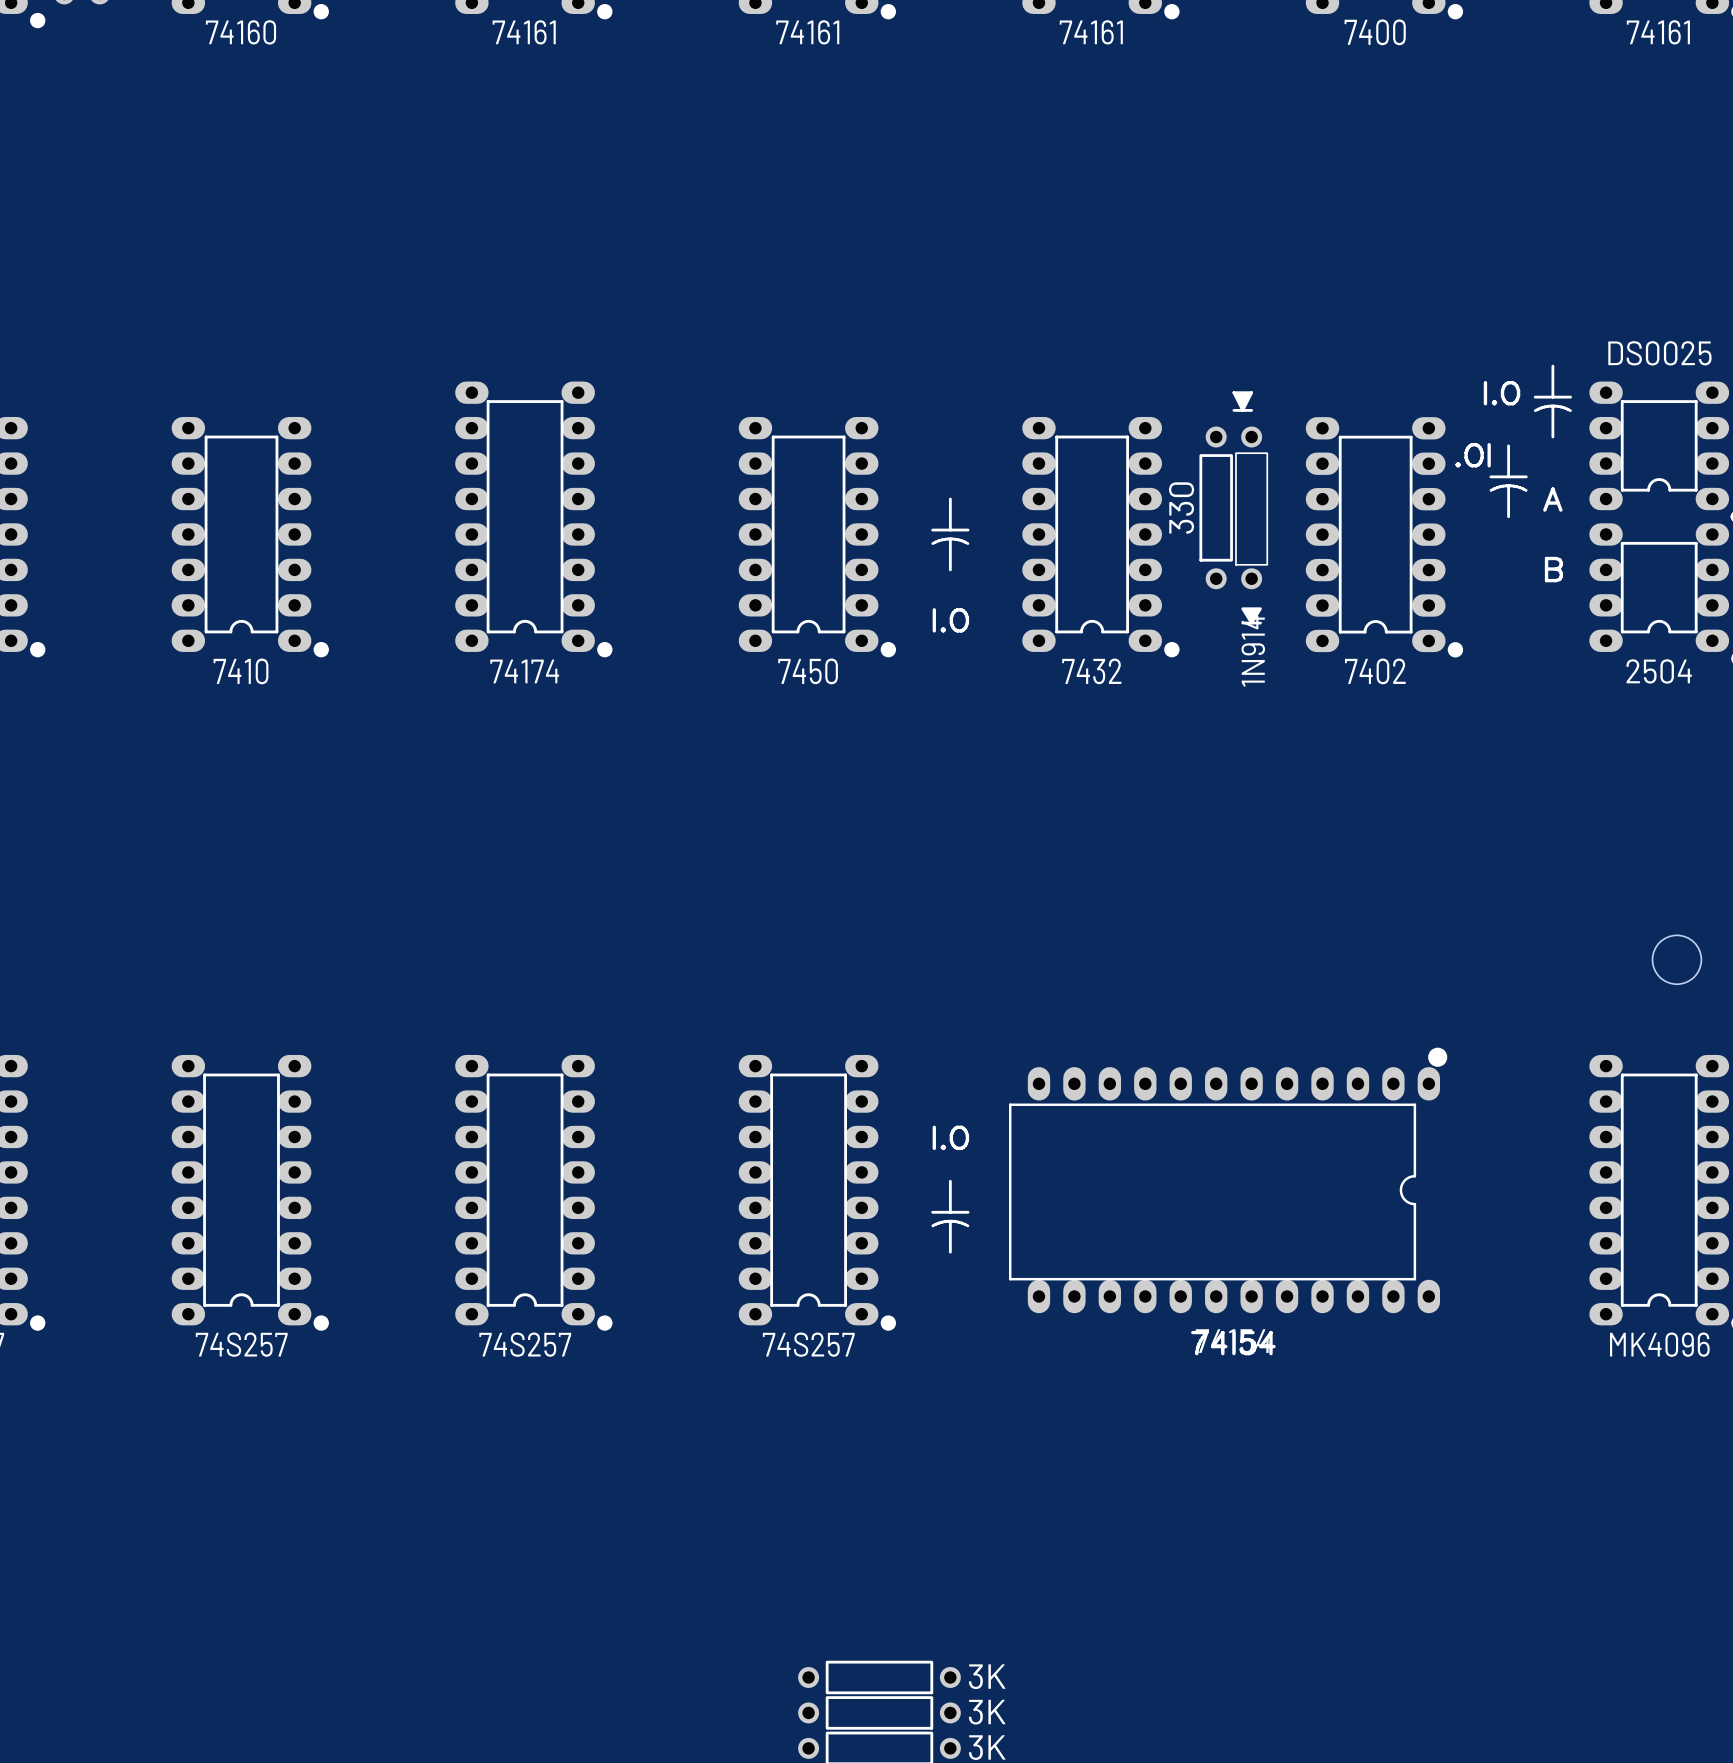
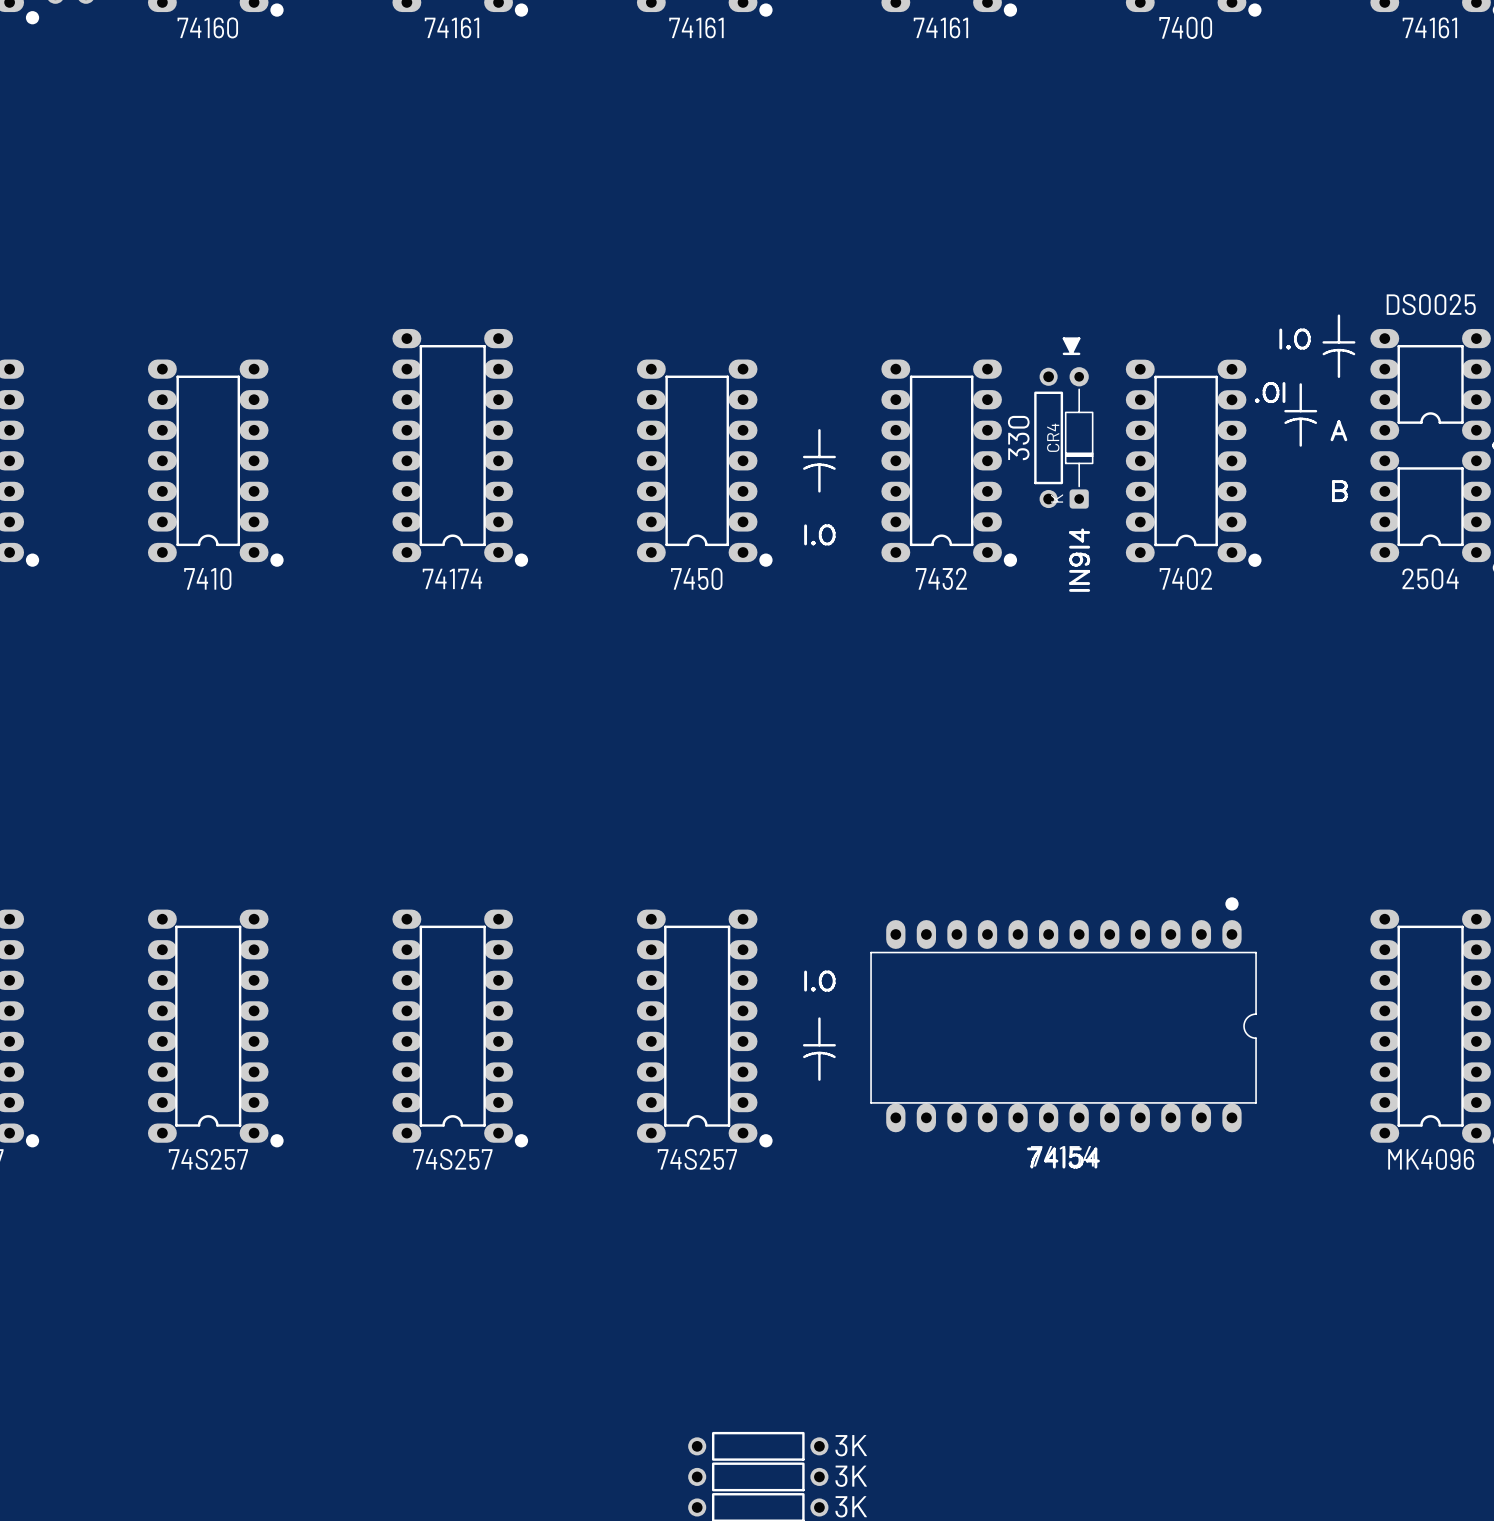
CR4: none -> (1079, 437)
part: 1N914 (1251, 525) -> none
line: none -> (1082, 529) (1082, 541) (1070, 532) (1088, 532)
line: none -> (1070, 547) (1088, 547)
line: none -> (1076, 554) (1073, 554) (1070, 559) (1071, 562) (1075, 565) (1079, 564) (1081, 560) (1080, 556) (1076, 554)
line: none -> (1076, 554) (1087, 556) (1088, 561) (1086, 564)
line: none -> (1070, 571) (1088, 571) (1070, 583) (1088, 583)
line: none -> (1070, 590) (1088, 590)
round board edge: [1651, 934, 1703, 986] -> none
part footprint: [1009, 1047, 1448, 1314] -> [870, 897, 1257, 1133]

